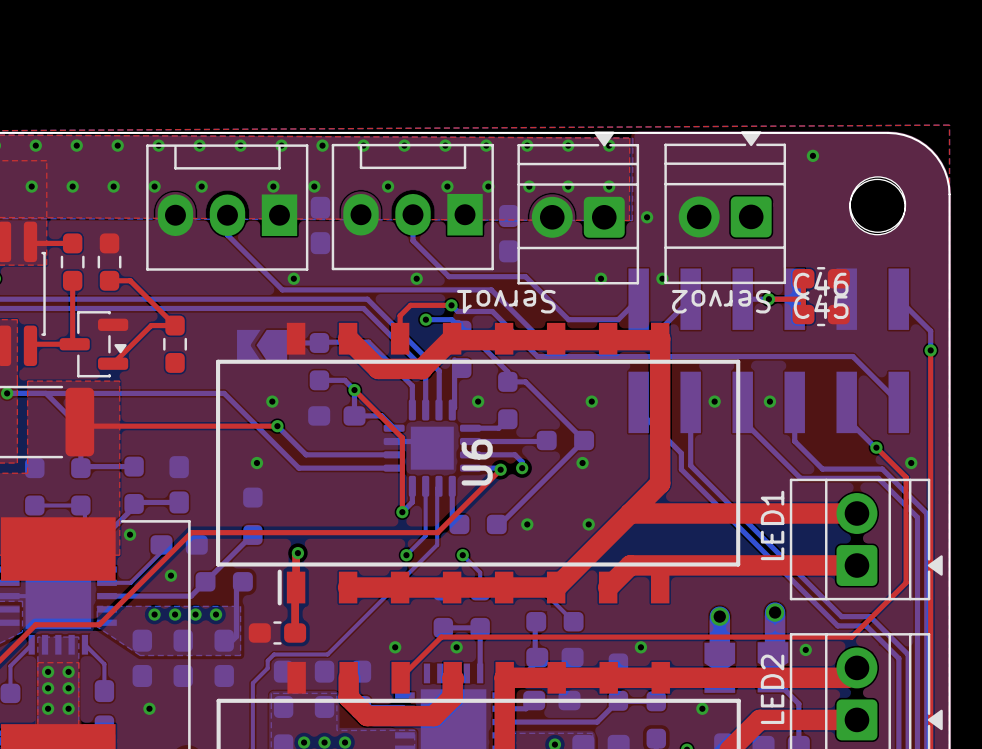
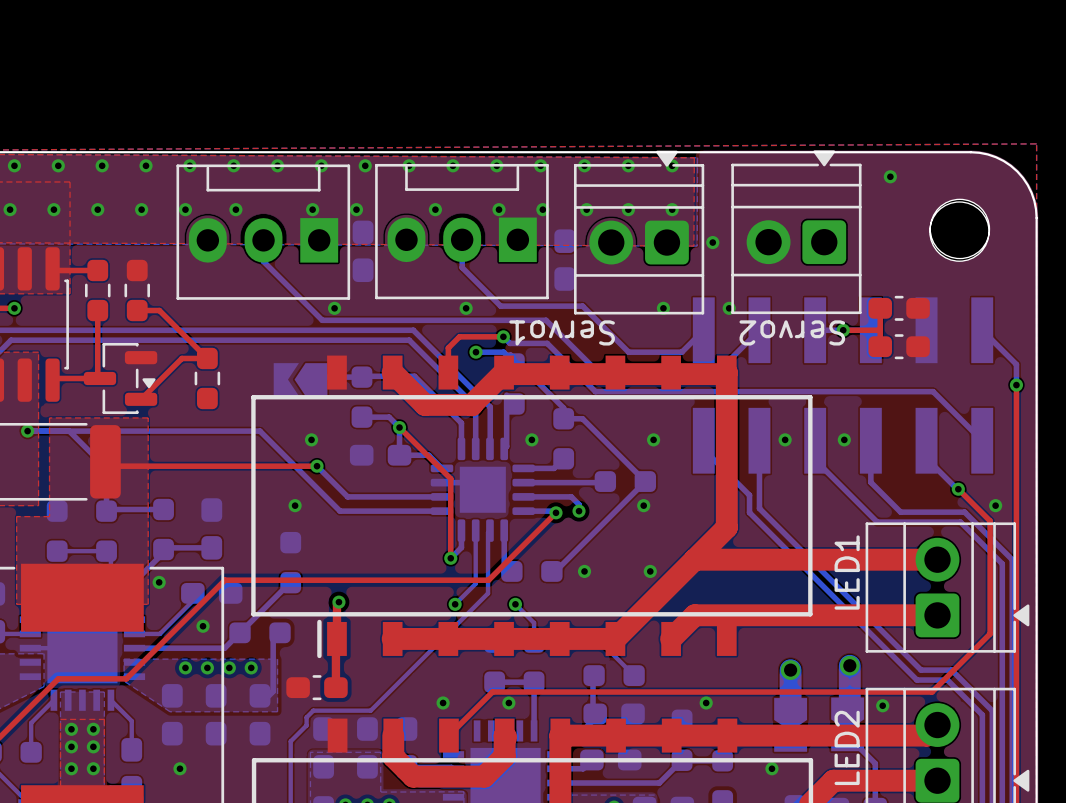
C46 name: C46 (821, 284) -> none
C45 name: C45 (821, 306) -> none
U6 name: U6 (477, 462) -> none

